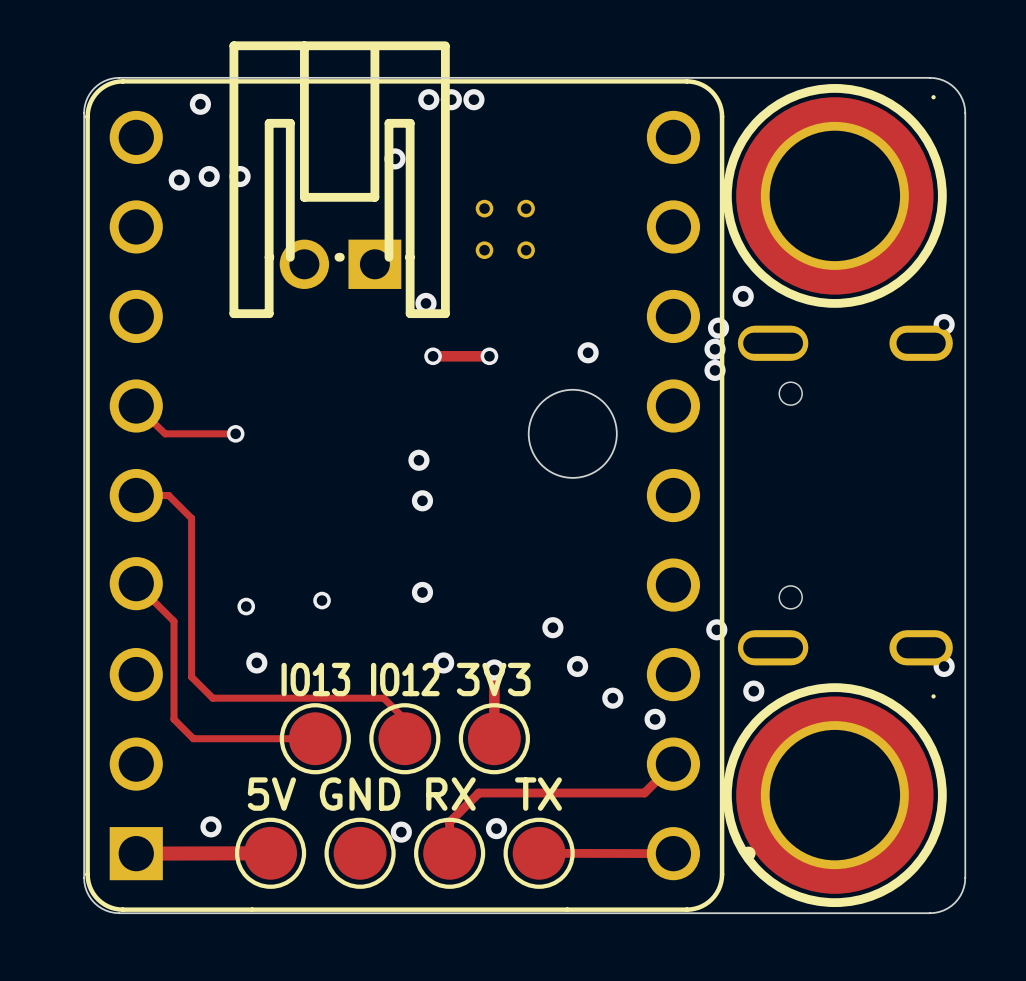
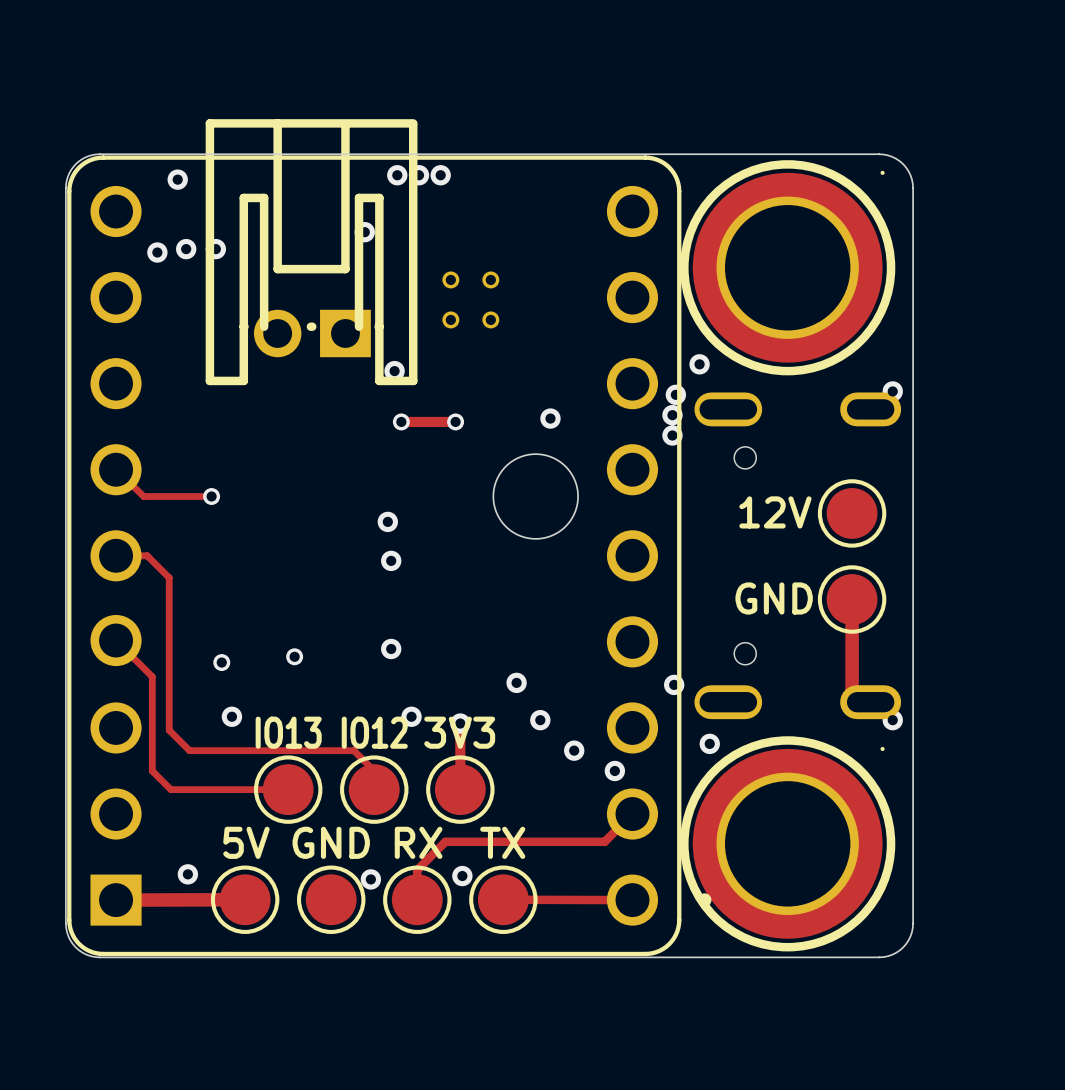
text: none -> 12V (775, 512)
part: none -> (852, 513)
text: none -> GND (774, 598)
track: none -> (852, 599) (852, 702)
part: none -> (852, 599)

